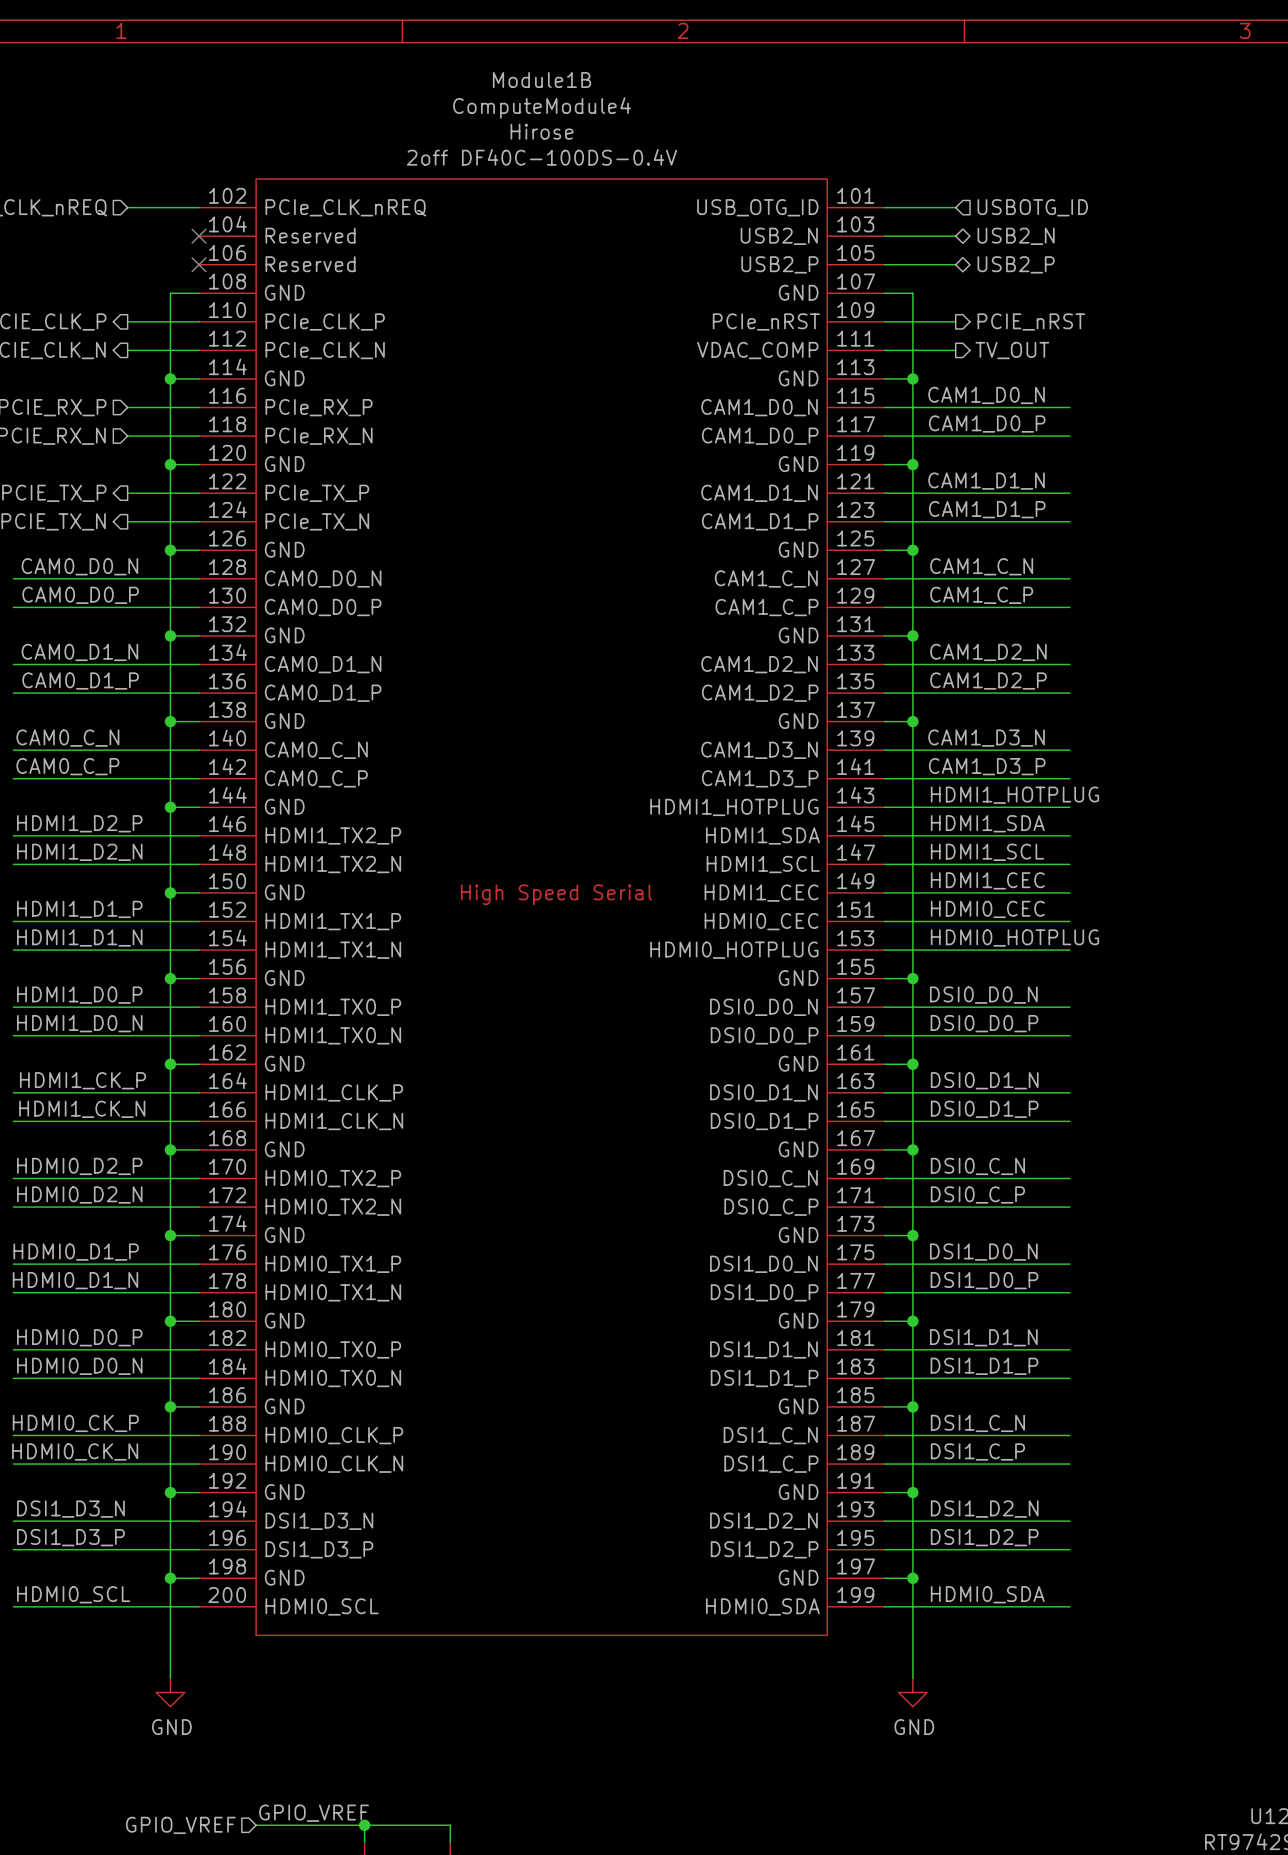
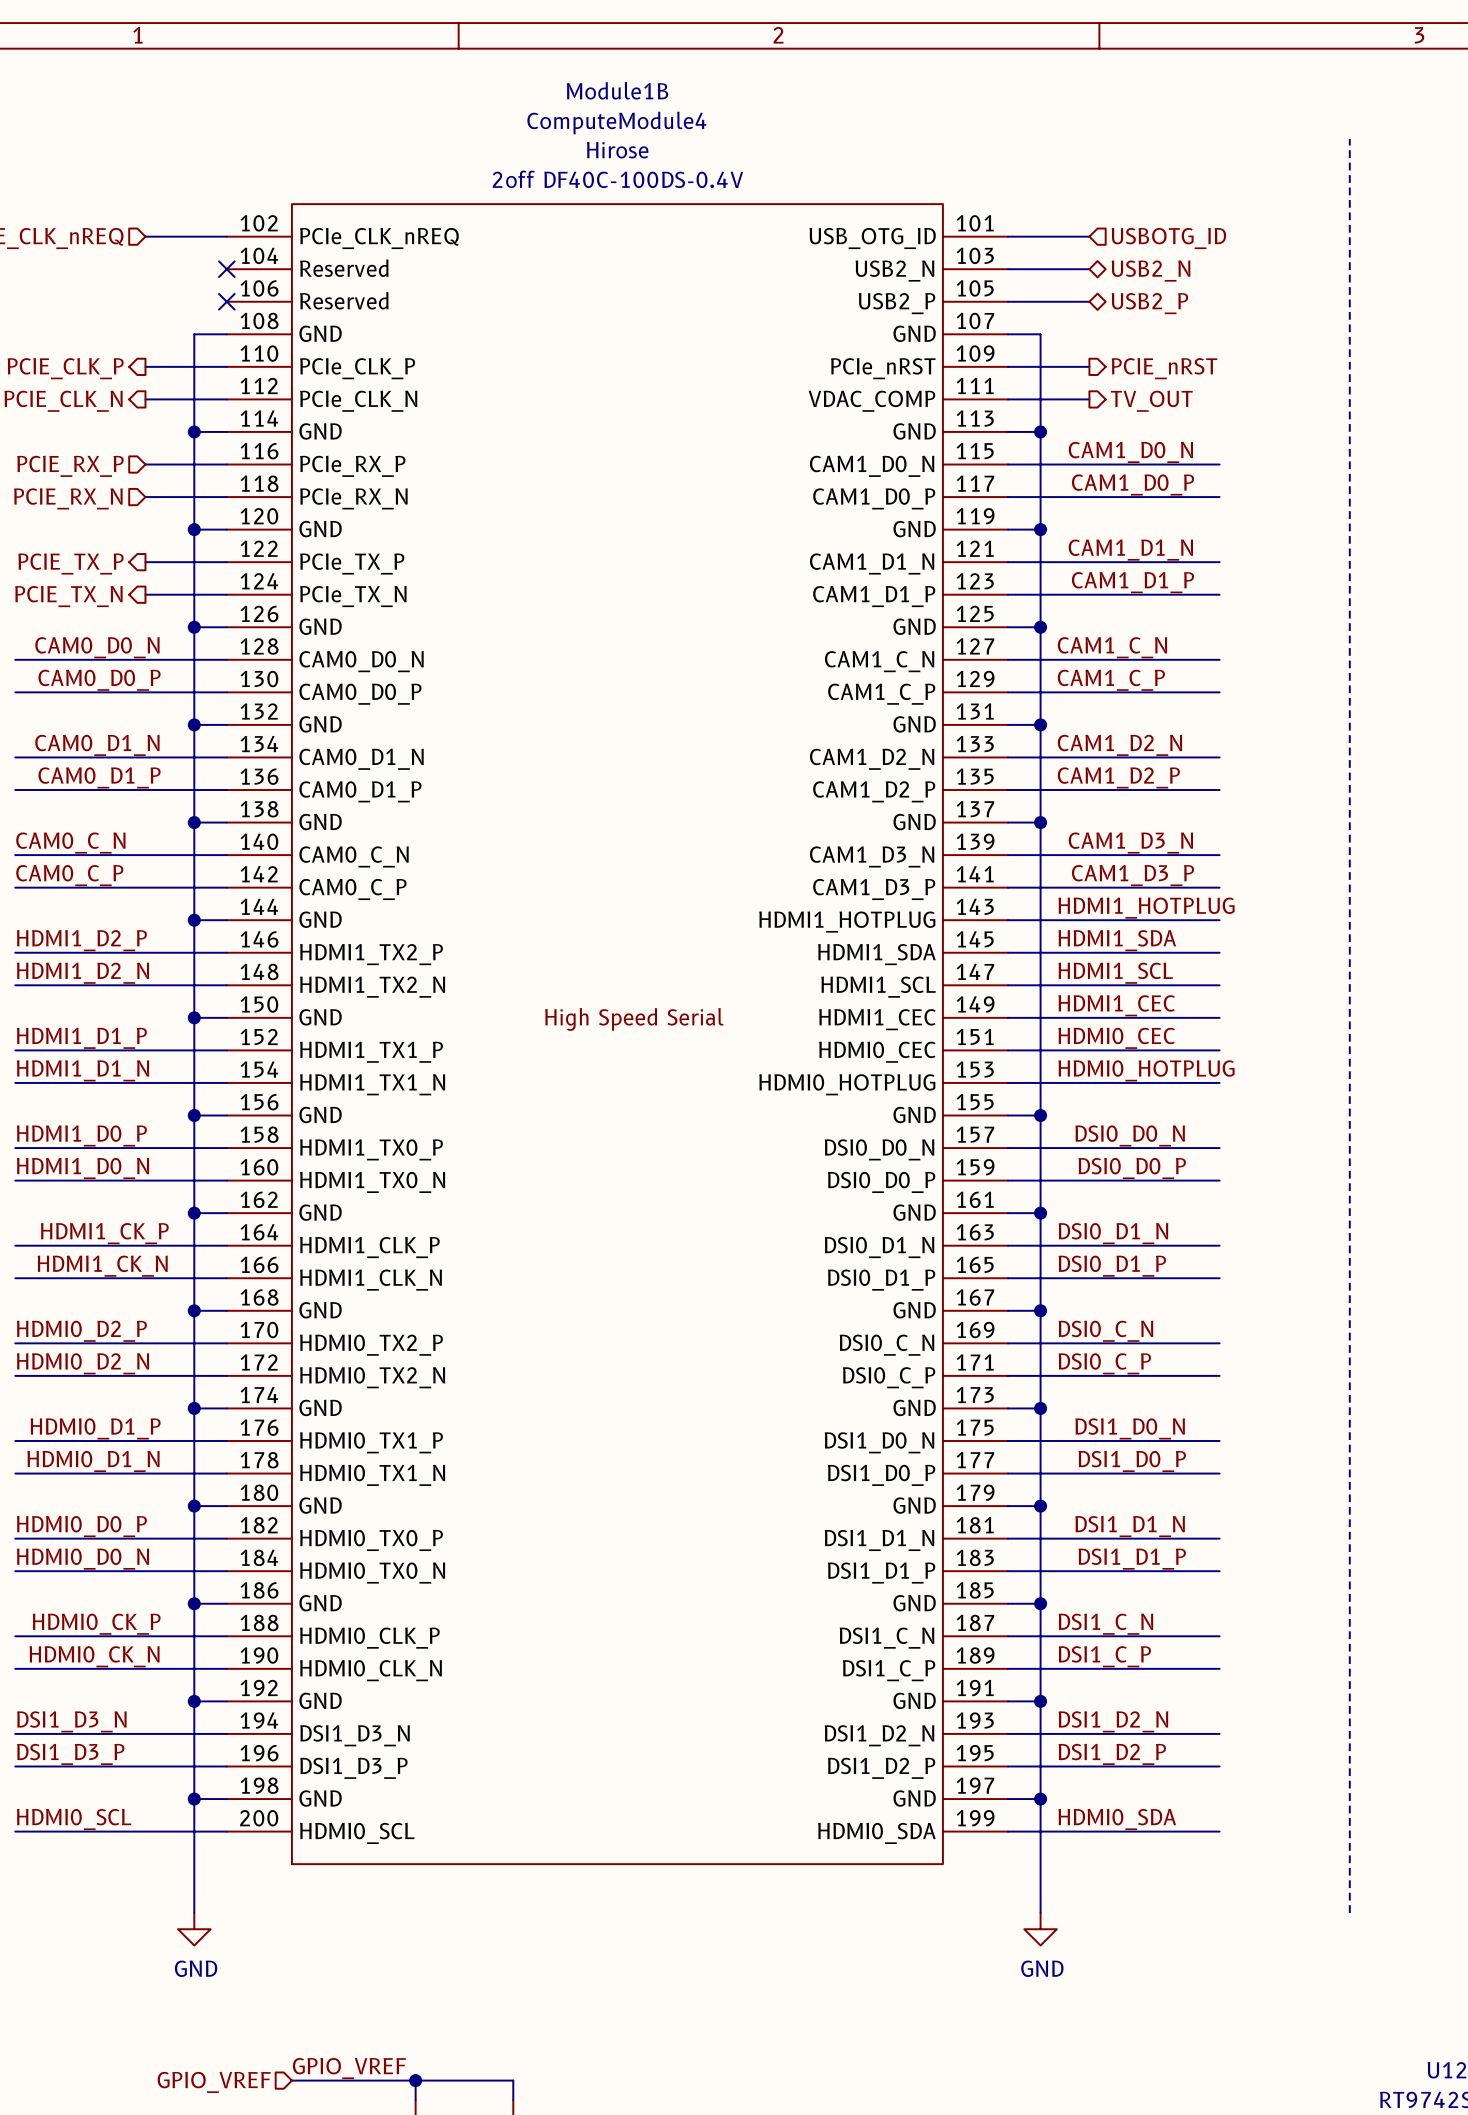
line: none -> (1349, 139) (1349, 1912)

